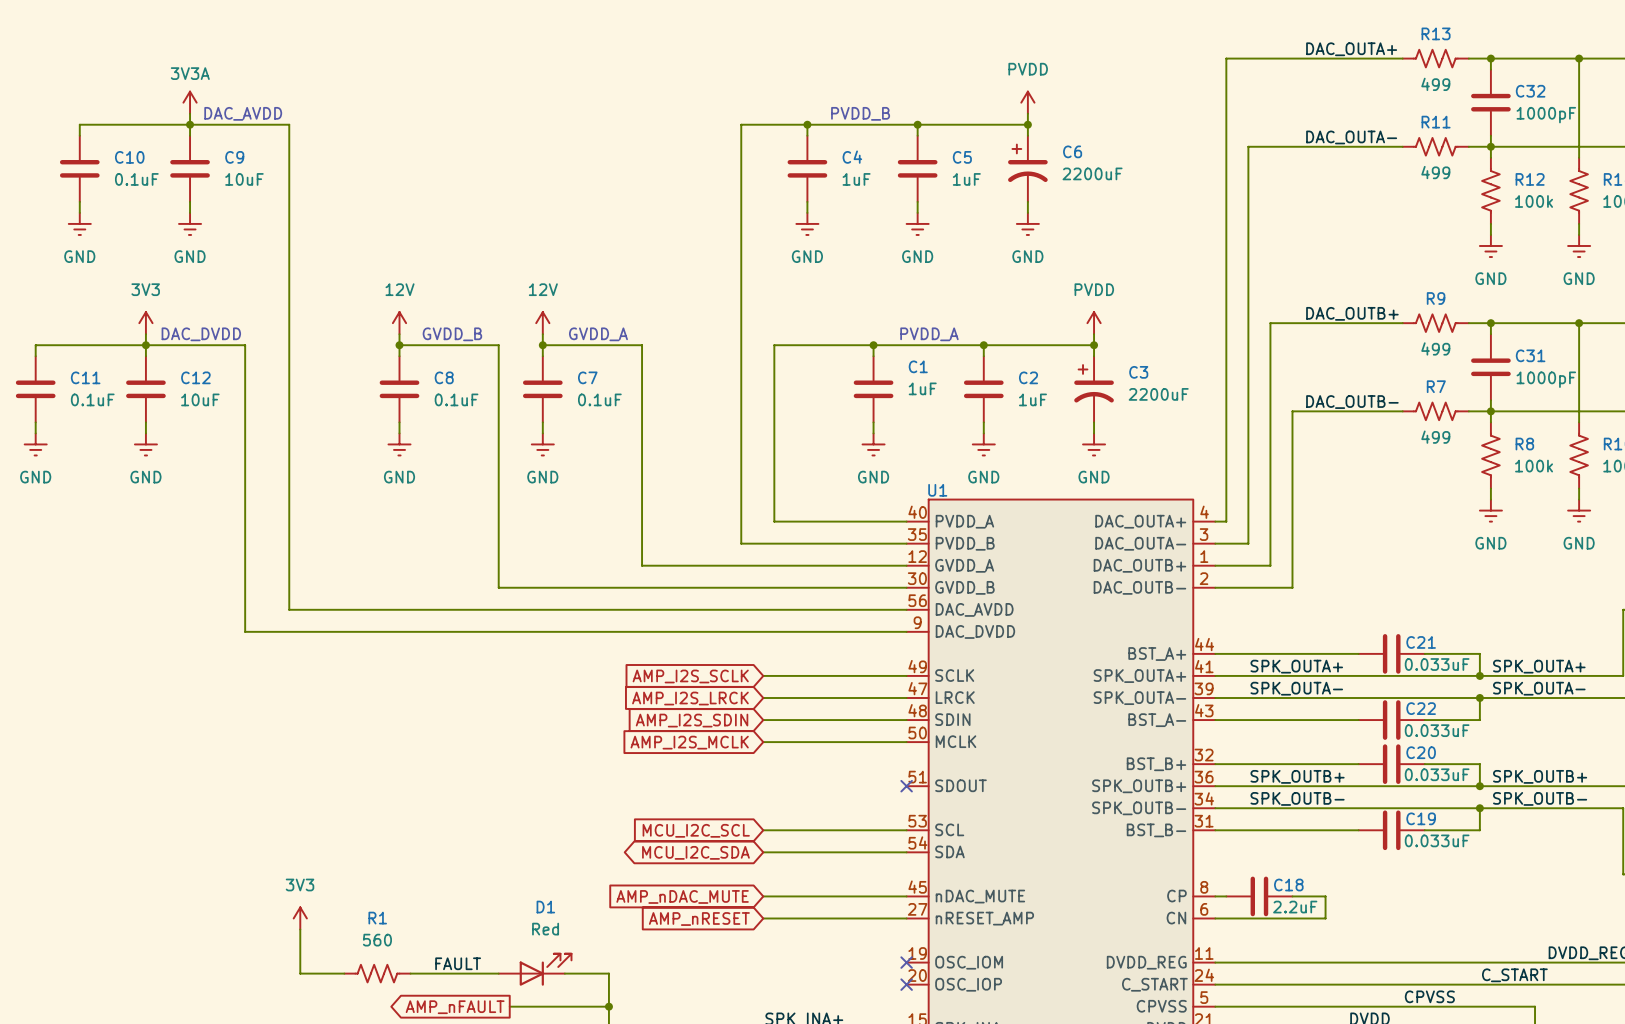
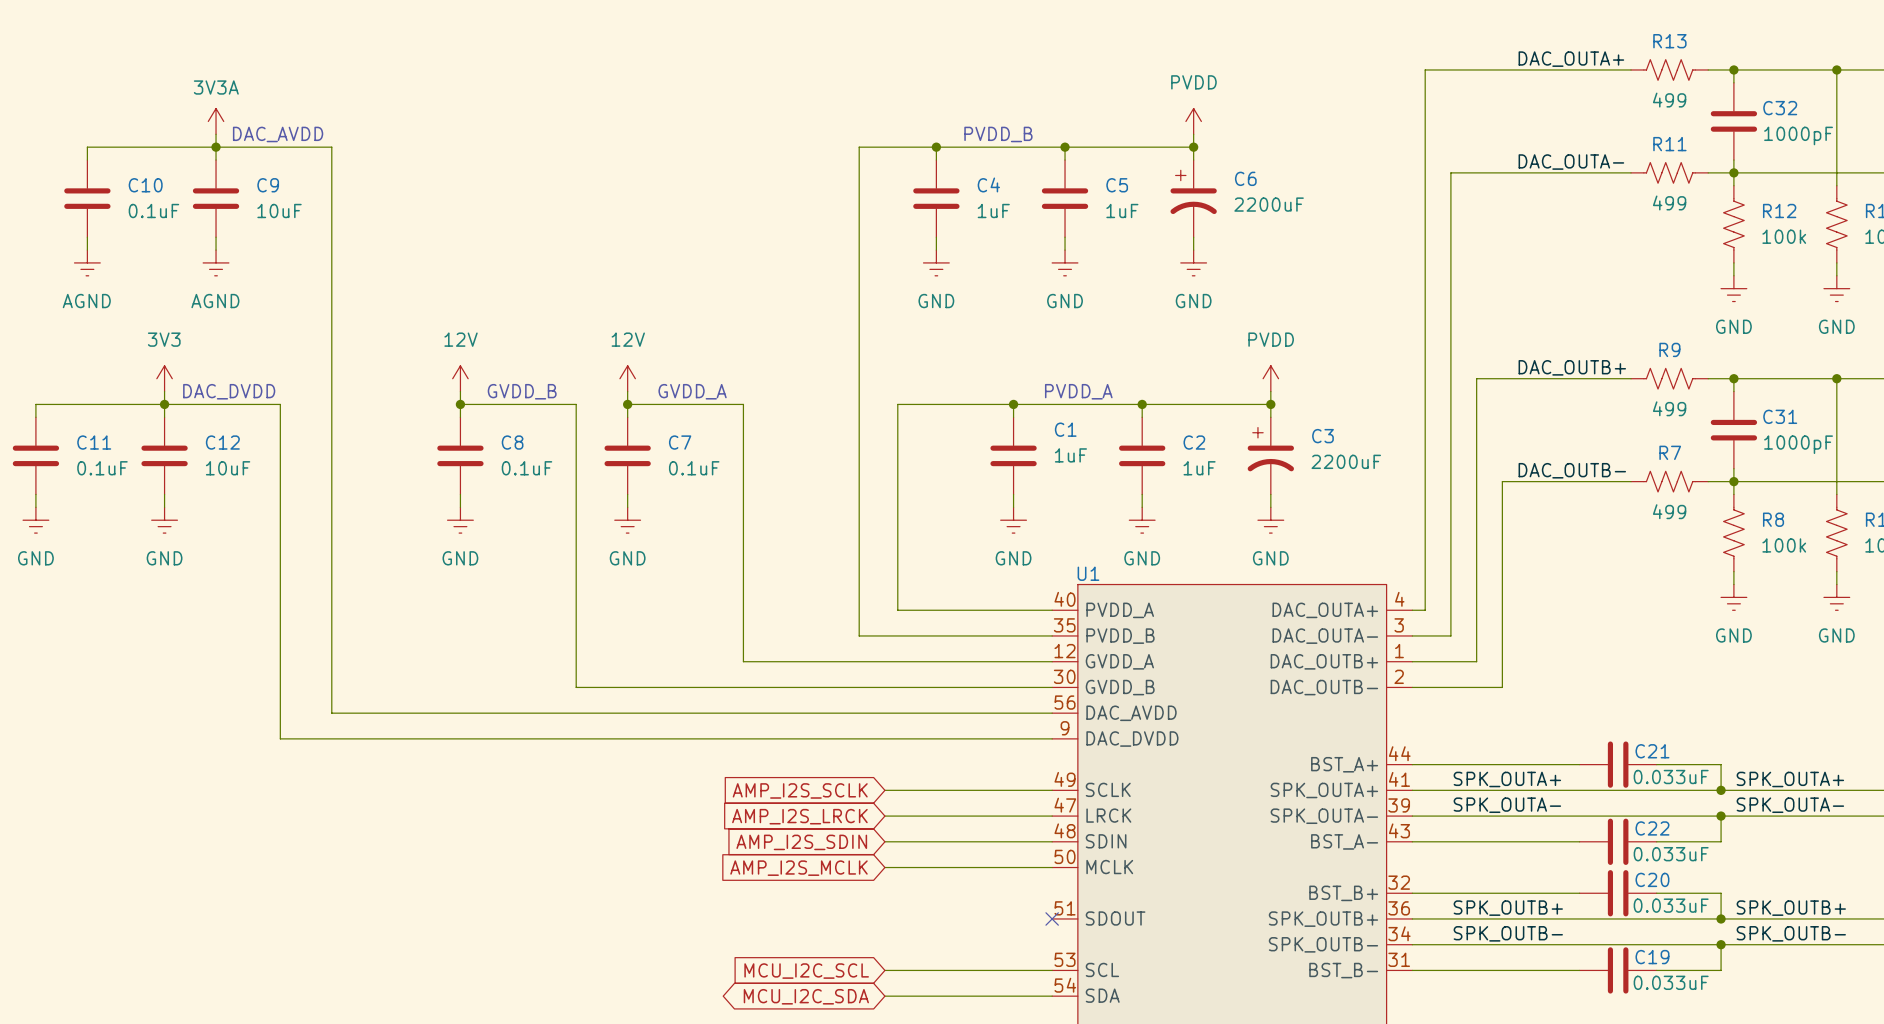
power symbol: GND (79, 223) -> AGND (87, 262)
power symbol: GND (190, 223) -> AGND (216, 262)

